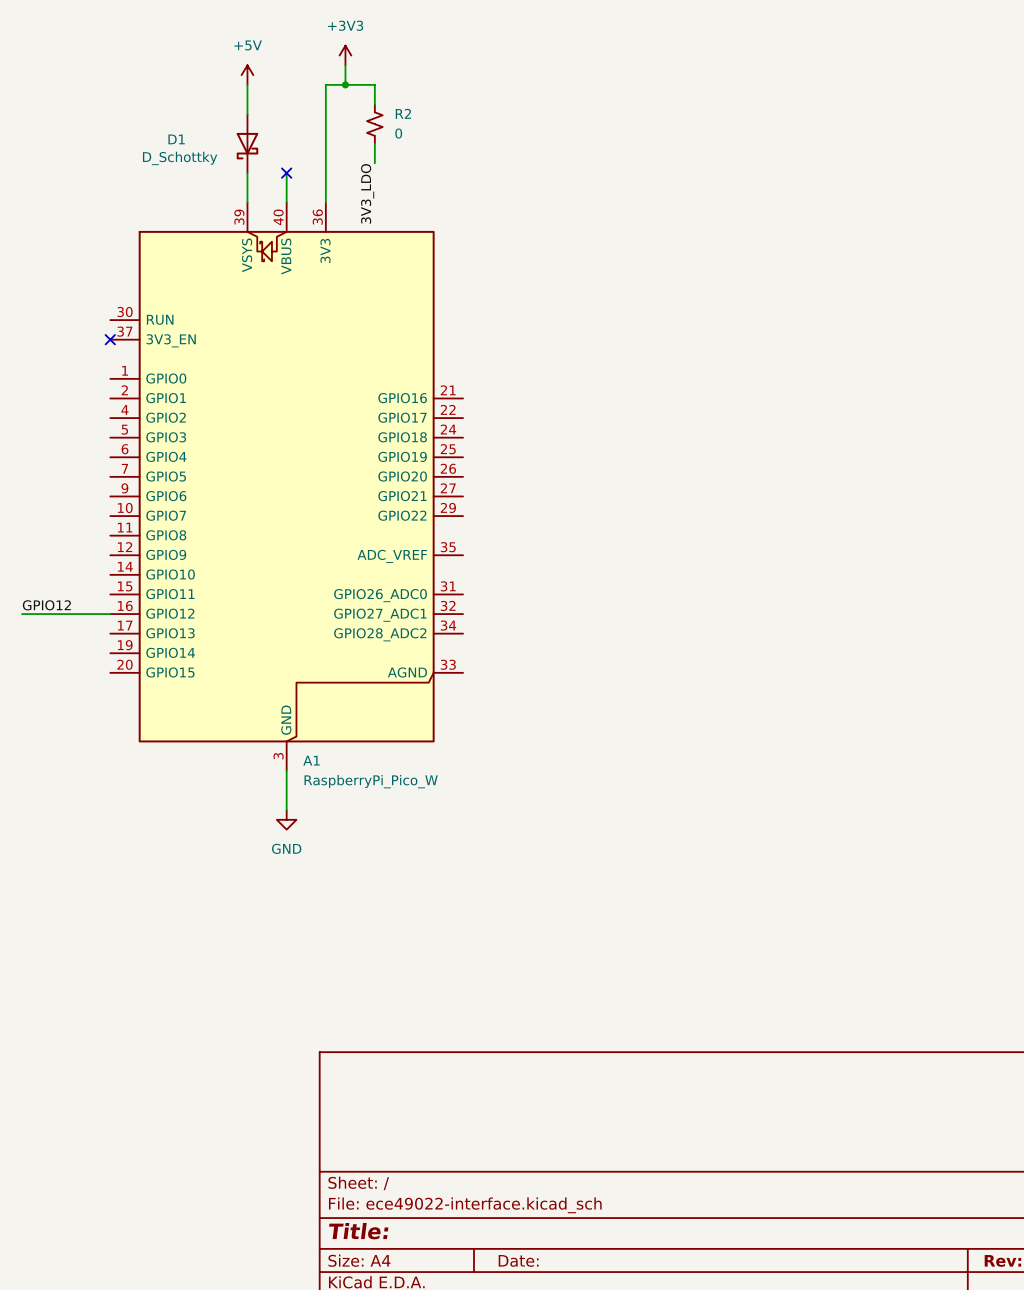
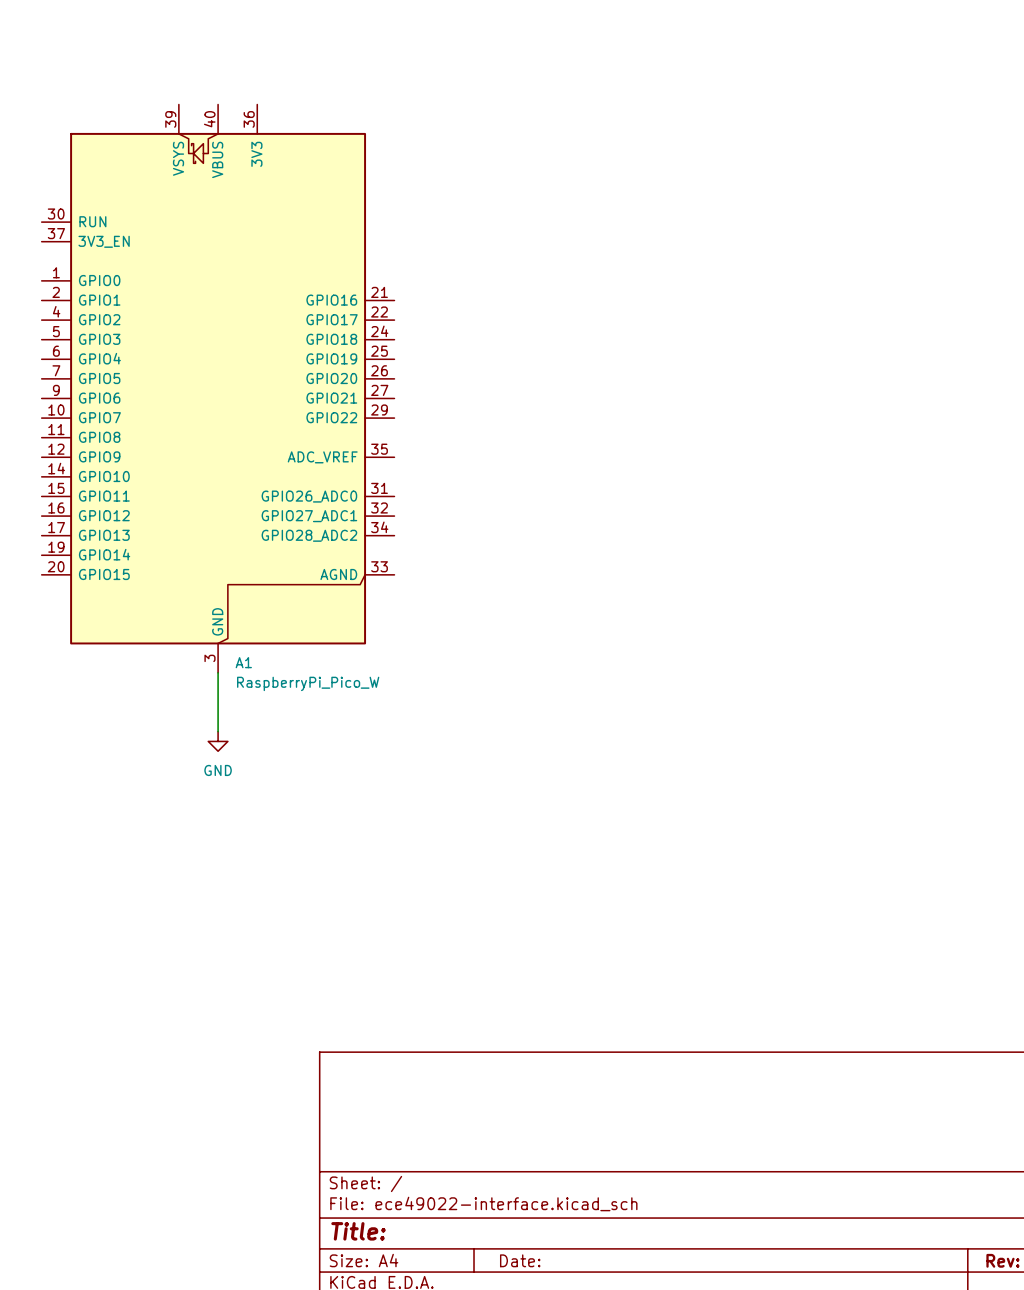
power symbol: +3V3 (345, 55) -> none
wire: (345, 65) (345, 84) -> none
power symbol: +5V (247, 75) -> none
wire: (247, 84) (247, 114) -> none
junction: (345, 84) -> none
wire: (374, 104) (374, 84) (325, 84) (325, 202) -> none
R2: 0 (374, 124) -> none
D1: D_Schottky (247, 143) -> none
wire: (374, 143) (374, 163) -> none
no-connect mark: (286, 173) -> none
label: 3V3_LDO (367, 193) -> none
no-connect mark: (110, 339) -> none
A1 position: (286, 486) -> (218, 388)
label: GPIO12 (46, 605) -> none
wire: (22, 614) (110, 614) -> none
wire: (286, 770) (286, 810) -> none
power symbol position: GND (286, 819) -> GND (218, 741)

